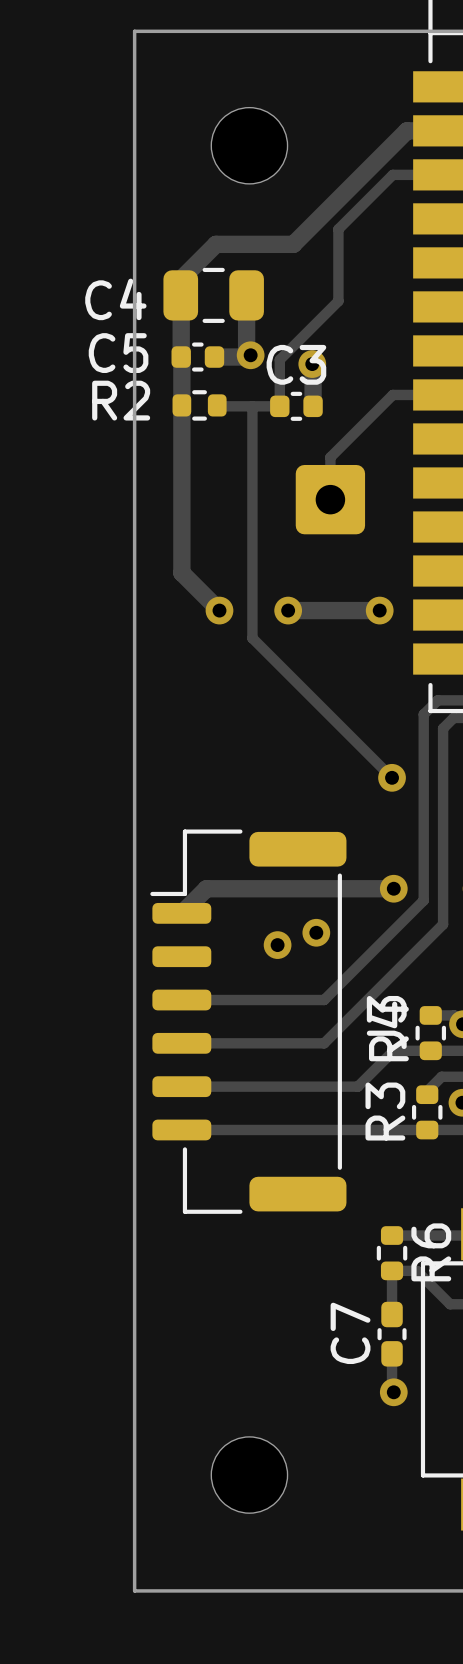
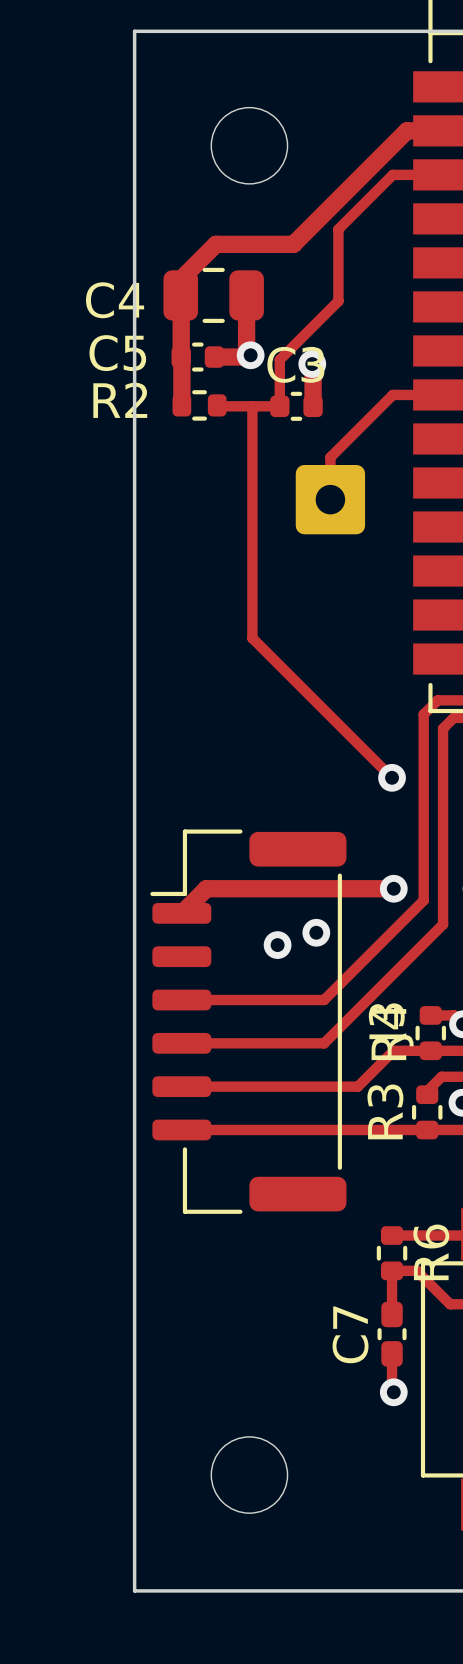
track: (181, 405) (181, 572) (219, 610) -> none
via: (219, 610) -> none
track: (288, 610) (379, 610) -> none
via: (288, 610) -> none
via: (379, 610) -> none

